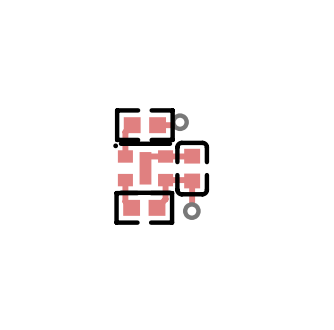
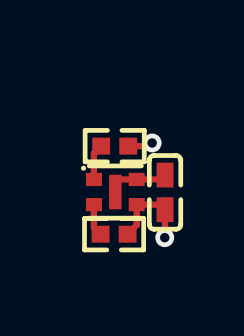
part footprint: [175, 140, 210, 197] -> [146, 153, 184, 232]

